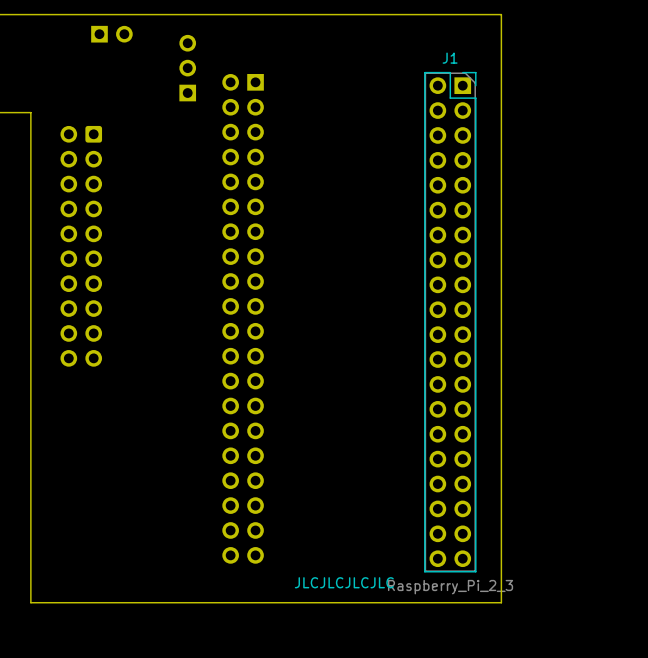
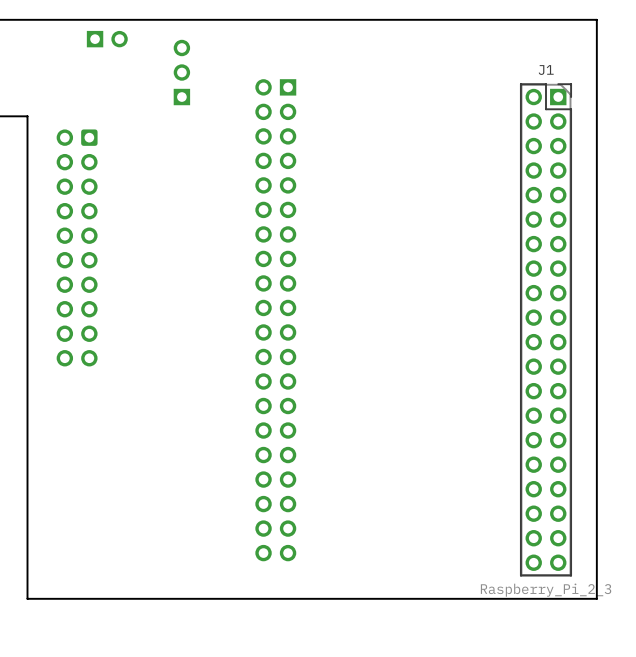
board edge: (501, 14) (501, 602) -> (490, 19) (596, 19) (596, 598) (490, 598)
part position: (243, 318) -> (275, 320)
J1 position: (450, 322) -> (545, 329)
text: JLCJLCJLCJLC (344, 582) -> none

